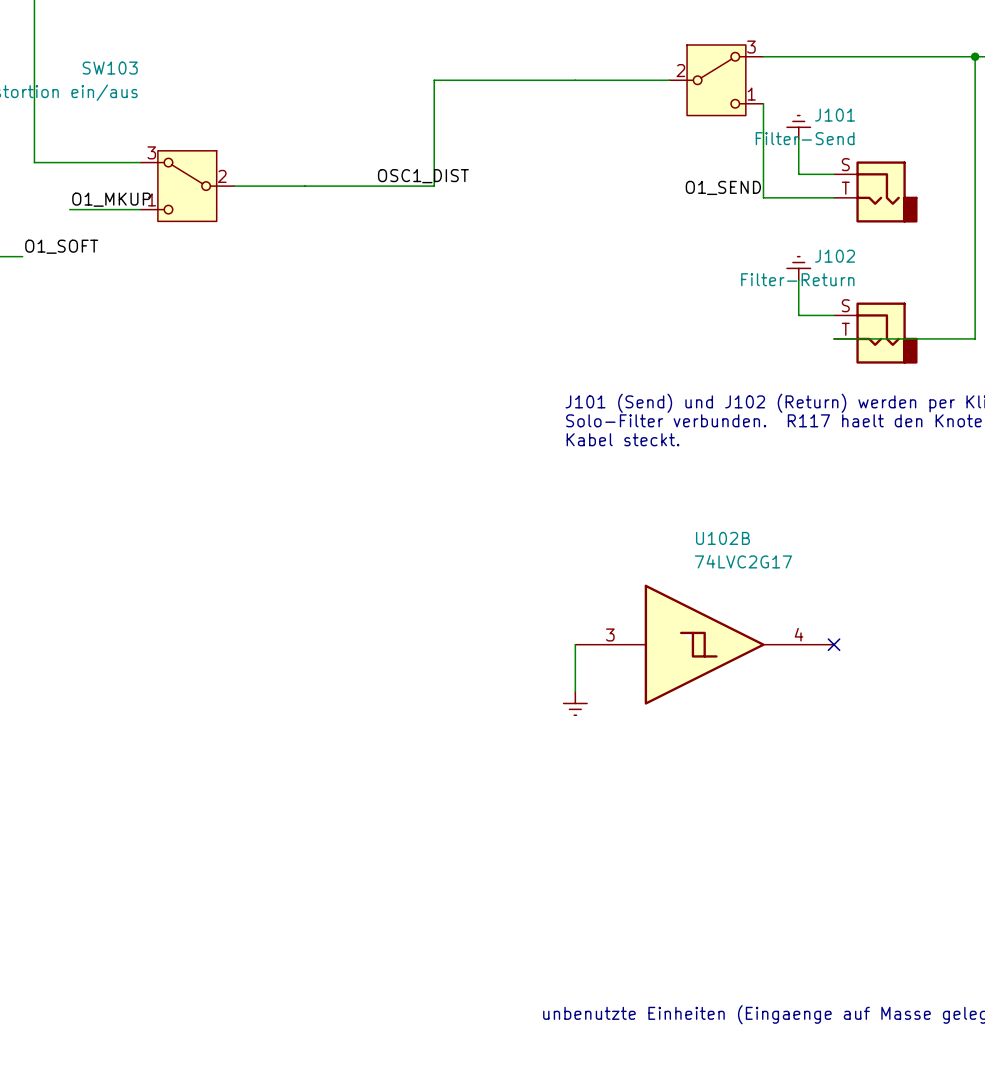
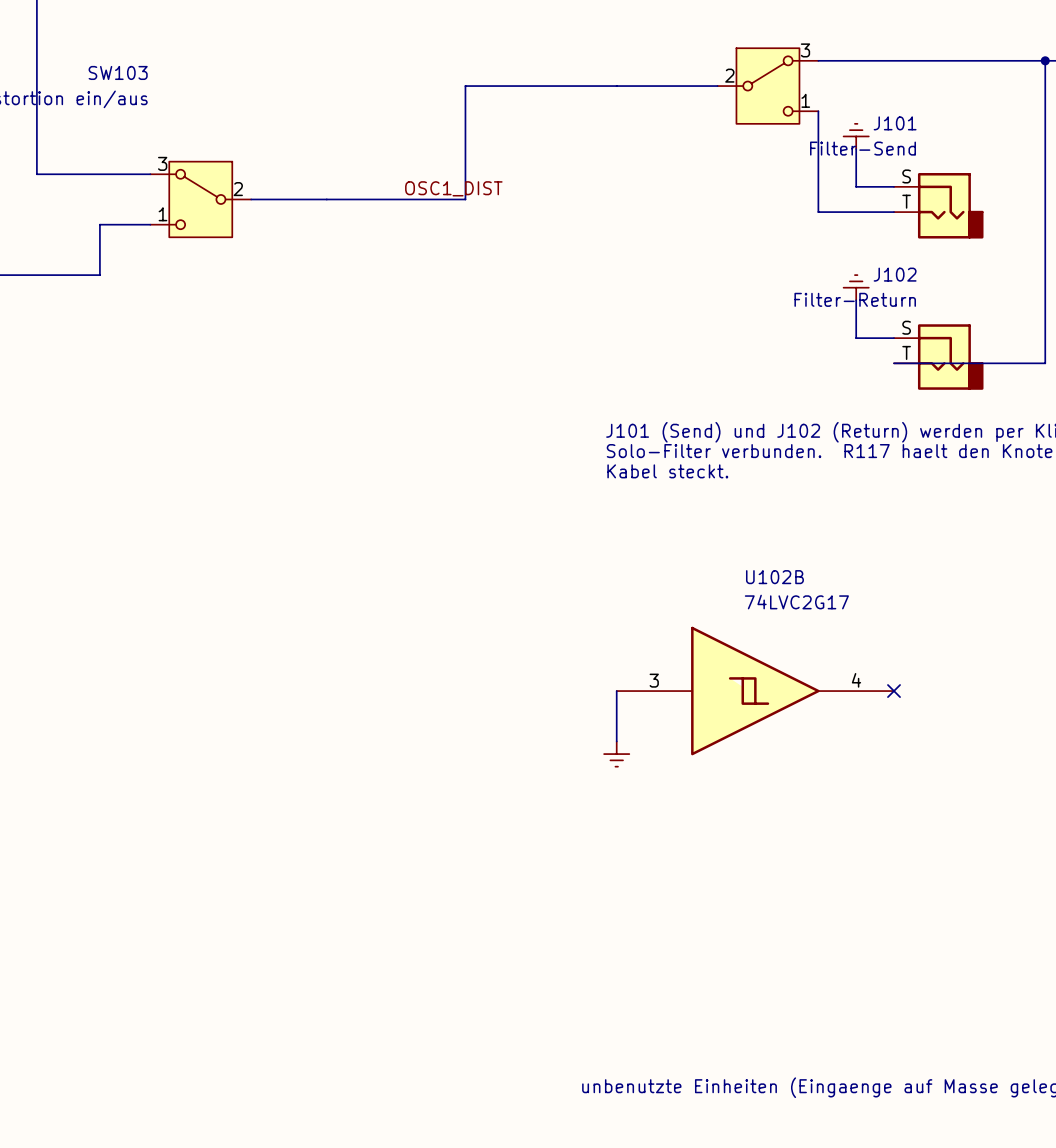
label: O1_SEND (723, 187) -> none
label: O1_MKUP (111, 199) -> none
wire: (69, 209) (93, 209) -> (24, 275) (99, 275) (99, 224)
label: O1_SOFT (61, 246) -> none

